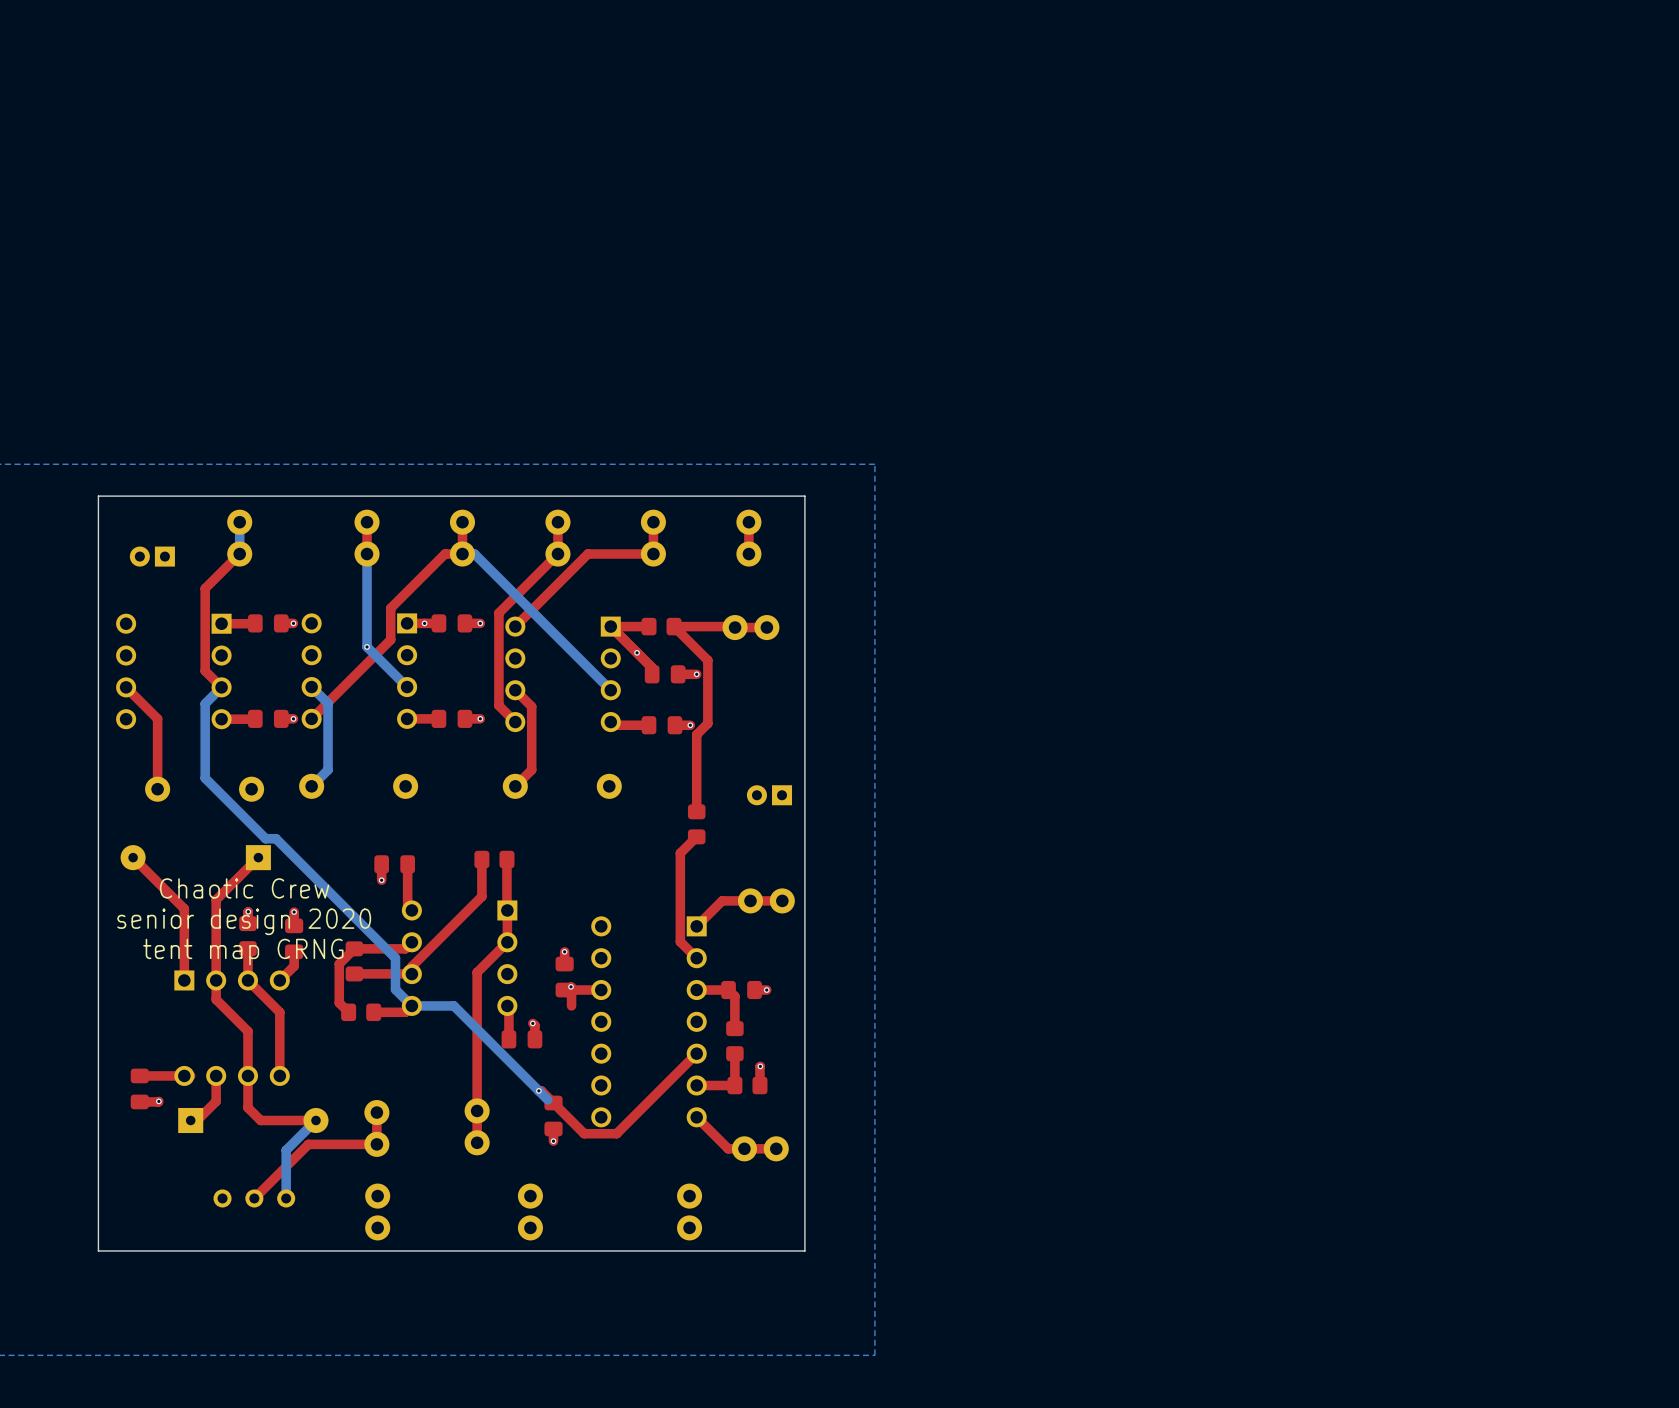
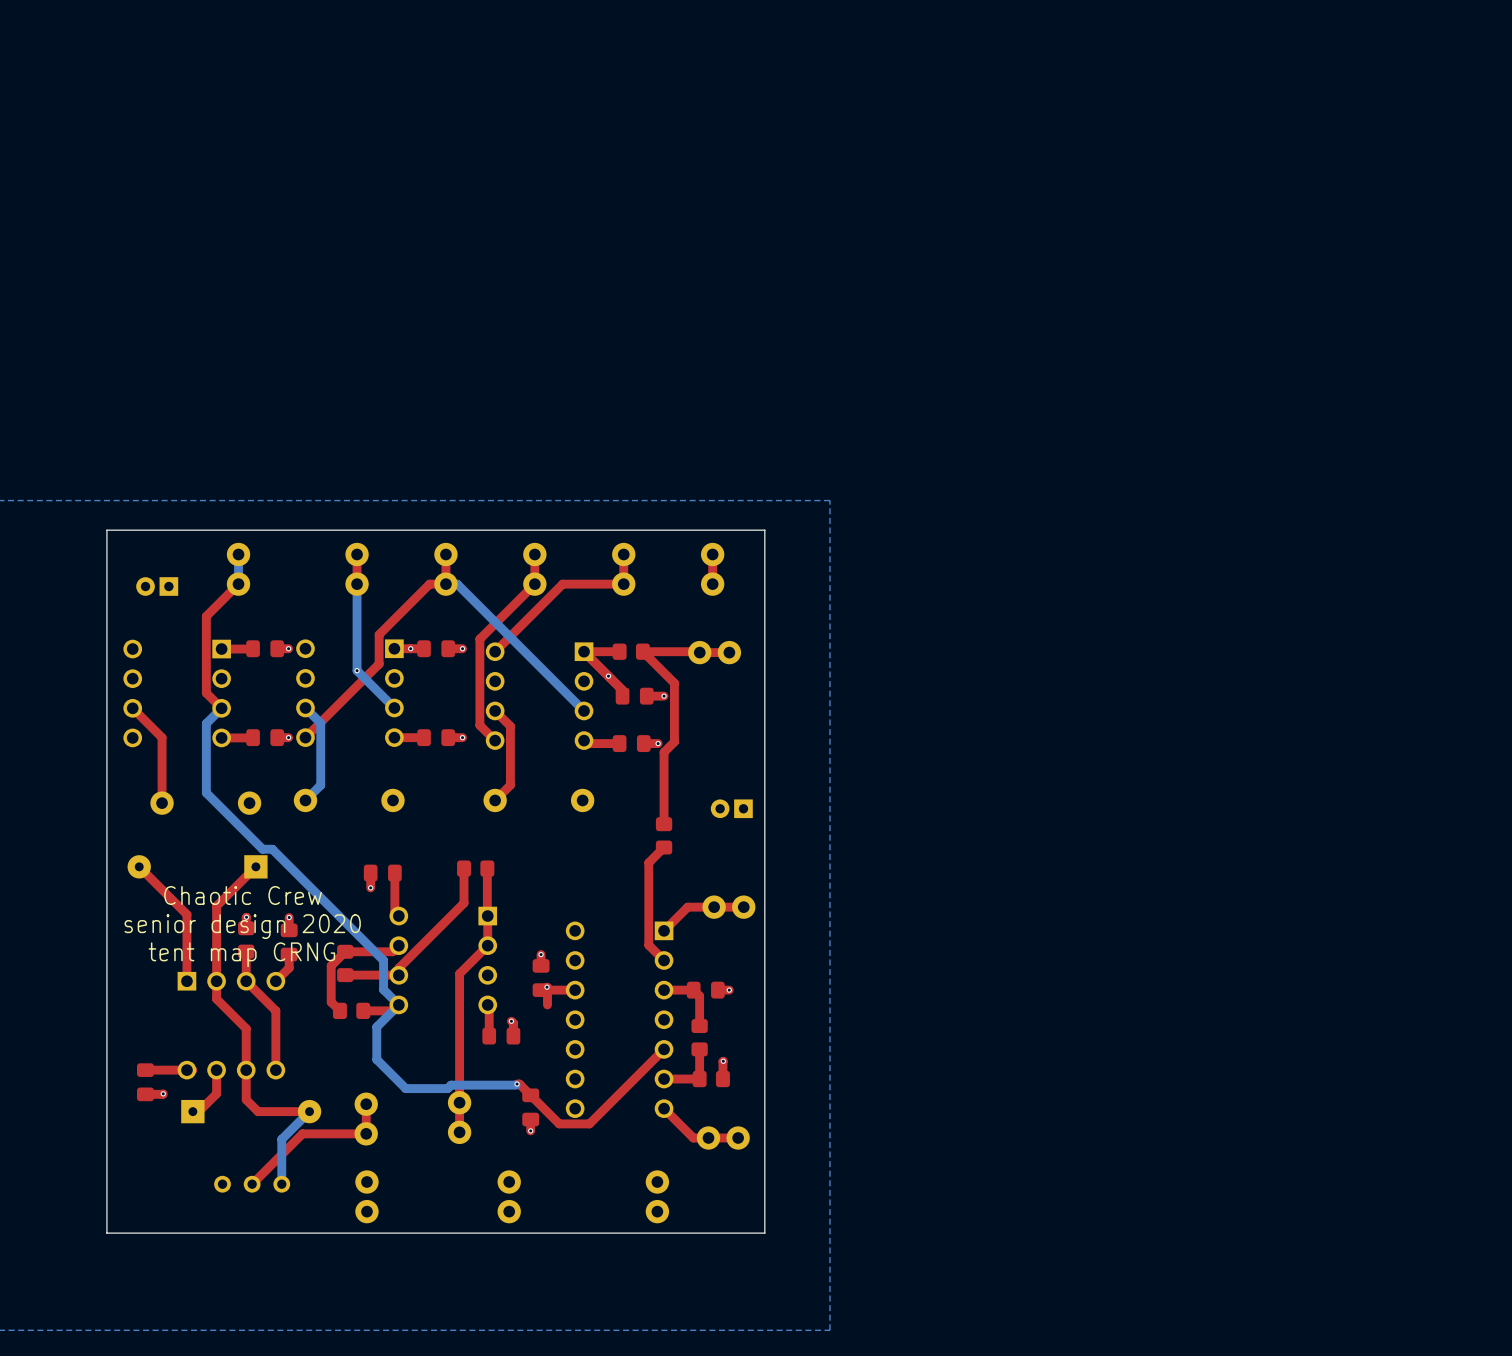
bottom track: (411, 1005) (453, 1005) (547, 1099) -> (398, 1004) (376, 1026) (376, 1059) (405, 1088) (447, 1088) (451, 1085) (516, 1085)

